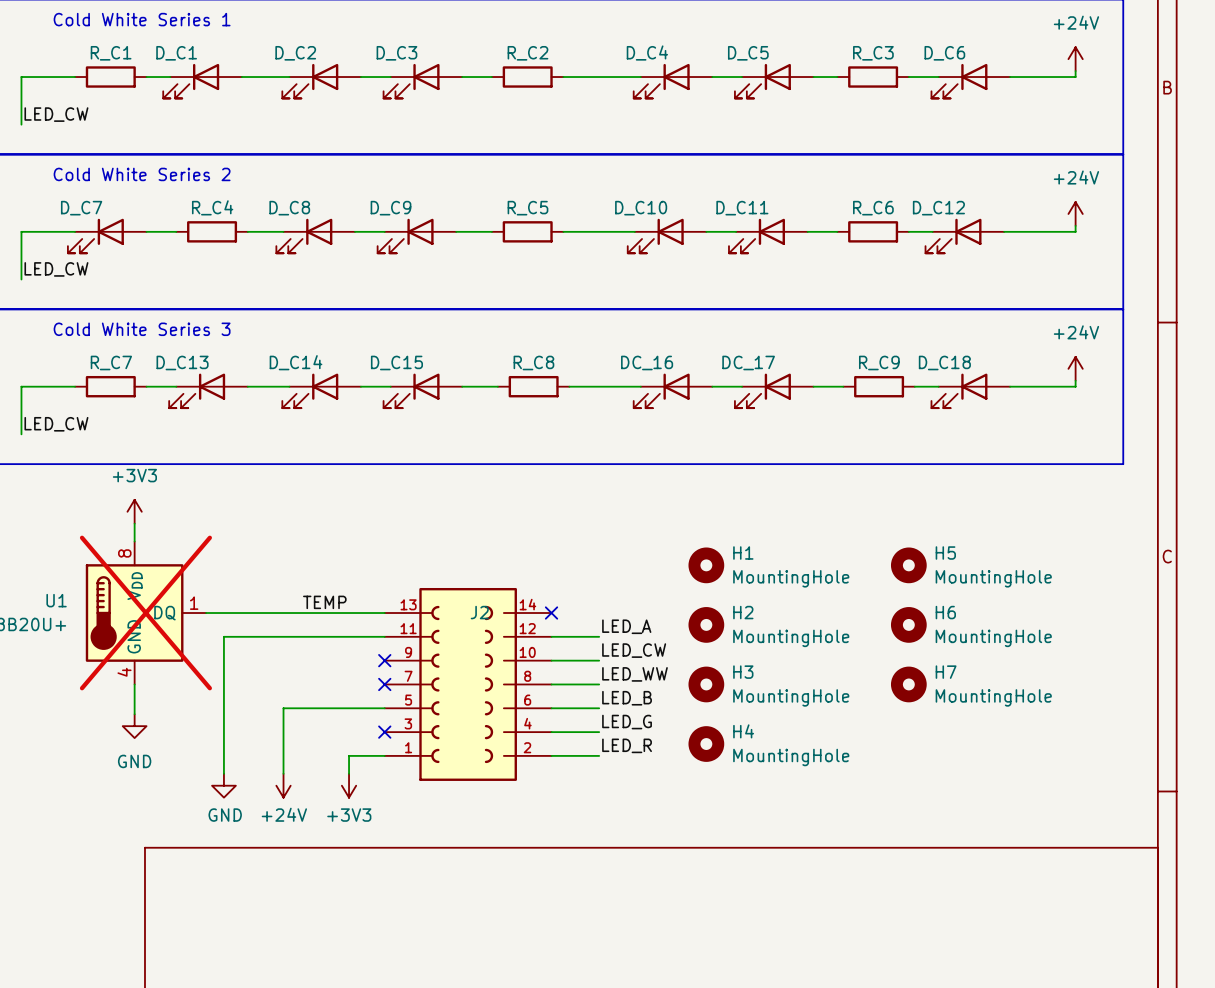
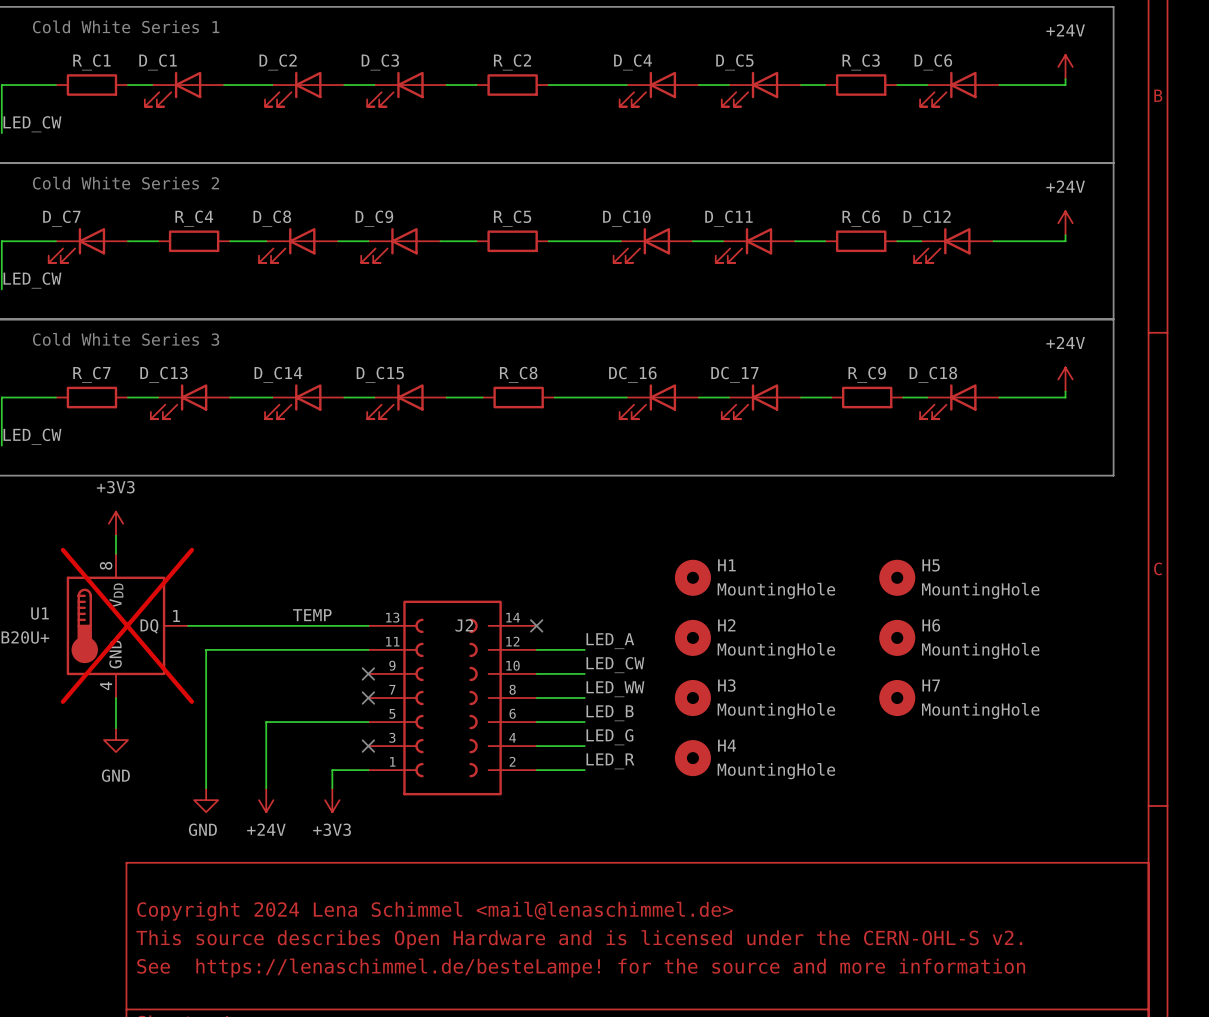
title block: none -> Copyright 2024 Lena Schimmel <mail@lenaschimmel.de> (435, 911)
title block: none -> This source describes Open Hardware and is licensed under the CERN-OHL-S v2. (579, 939)
title block: none -> See https://lenaschimmel.de/besteLampe! for the source and more information (581, 968)

